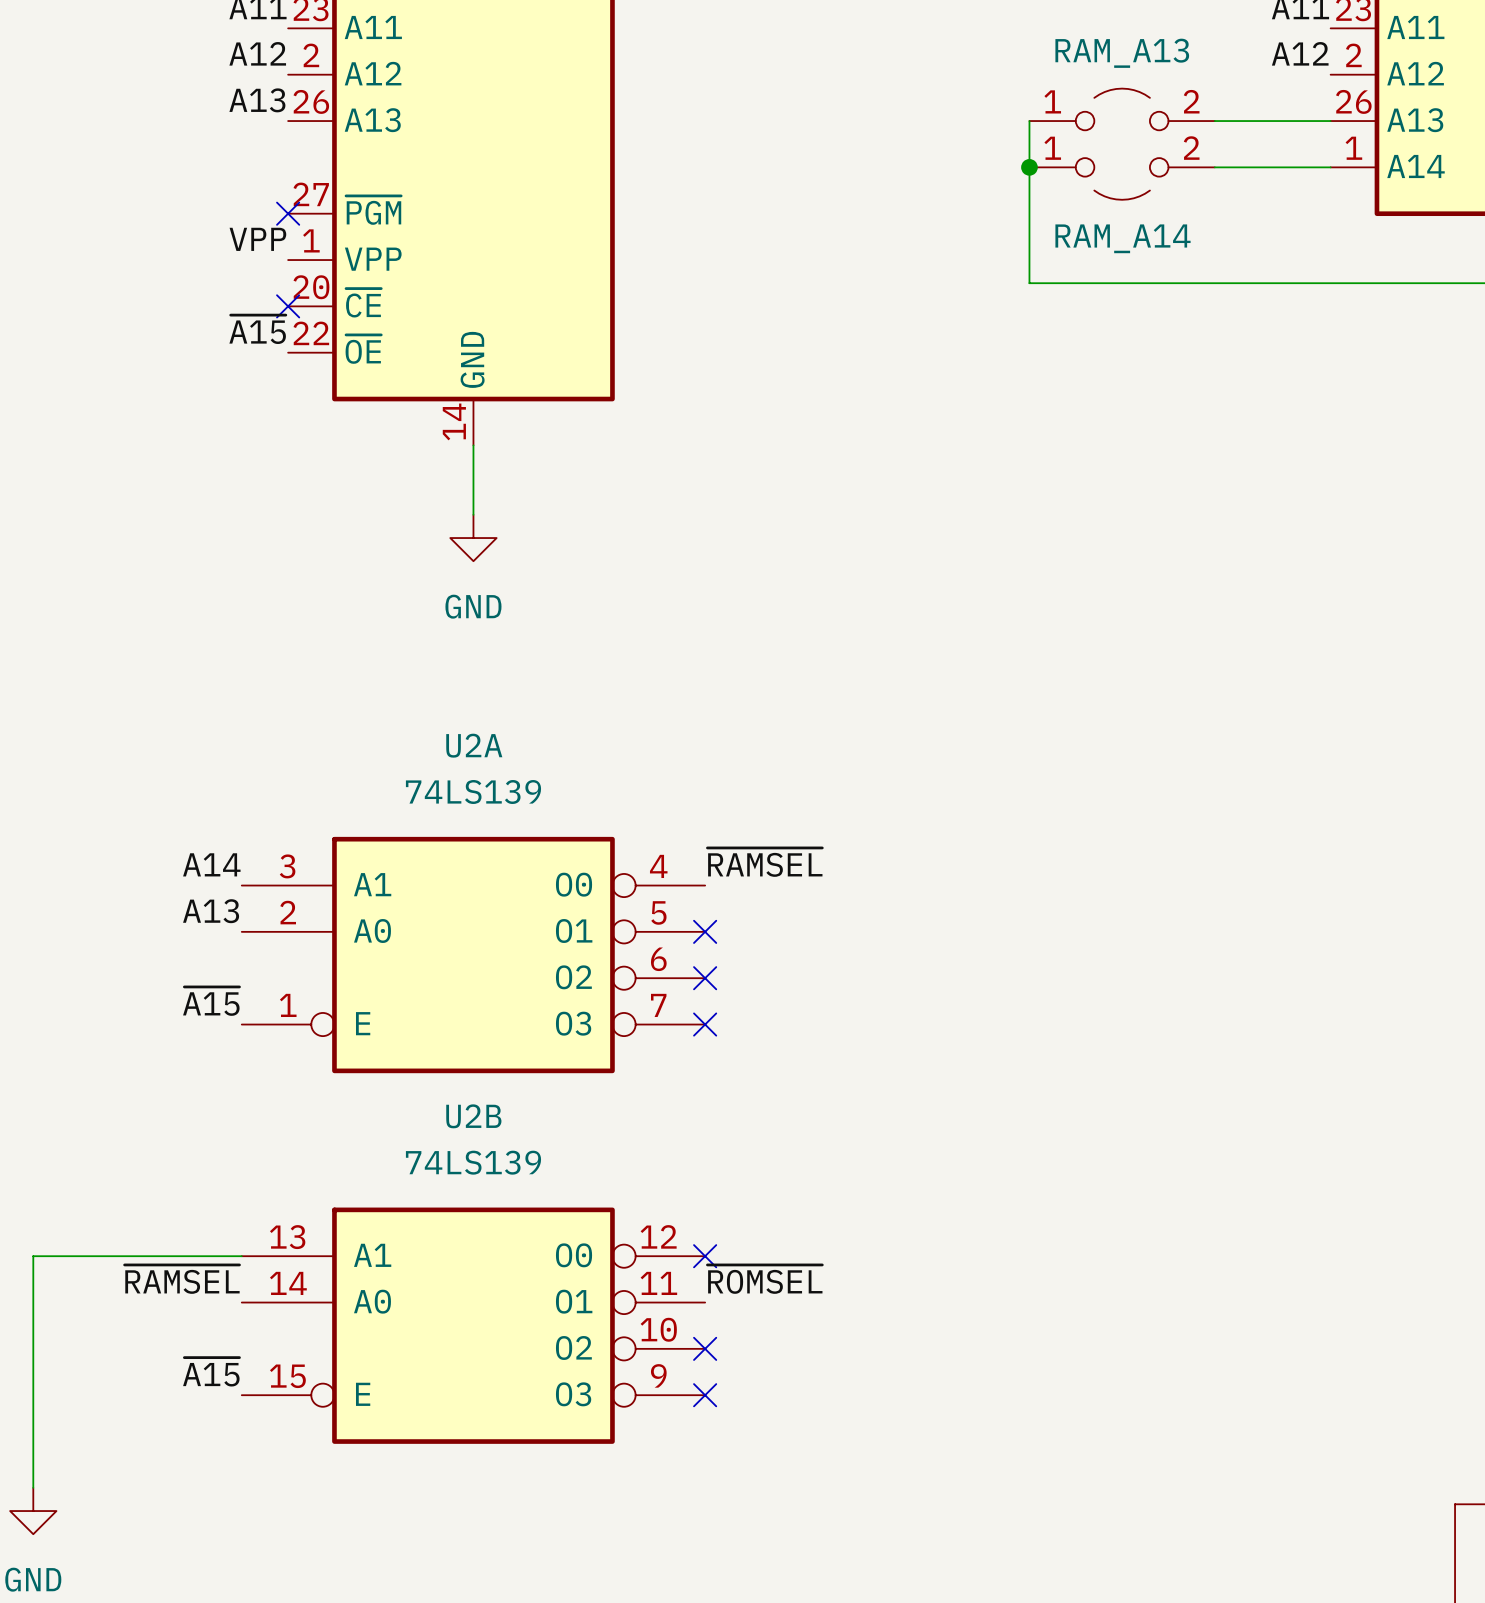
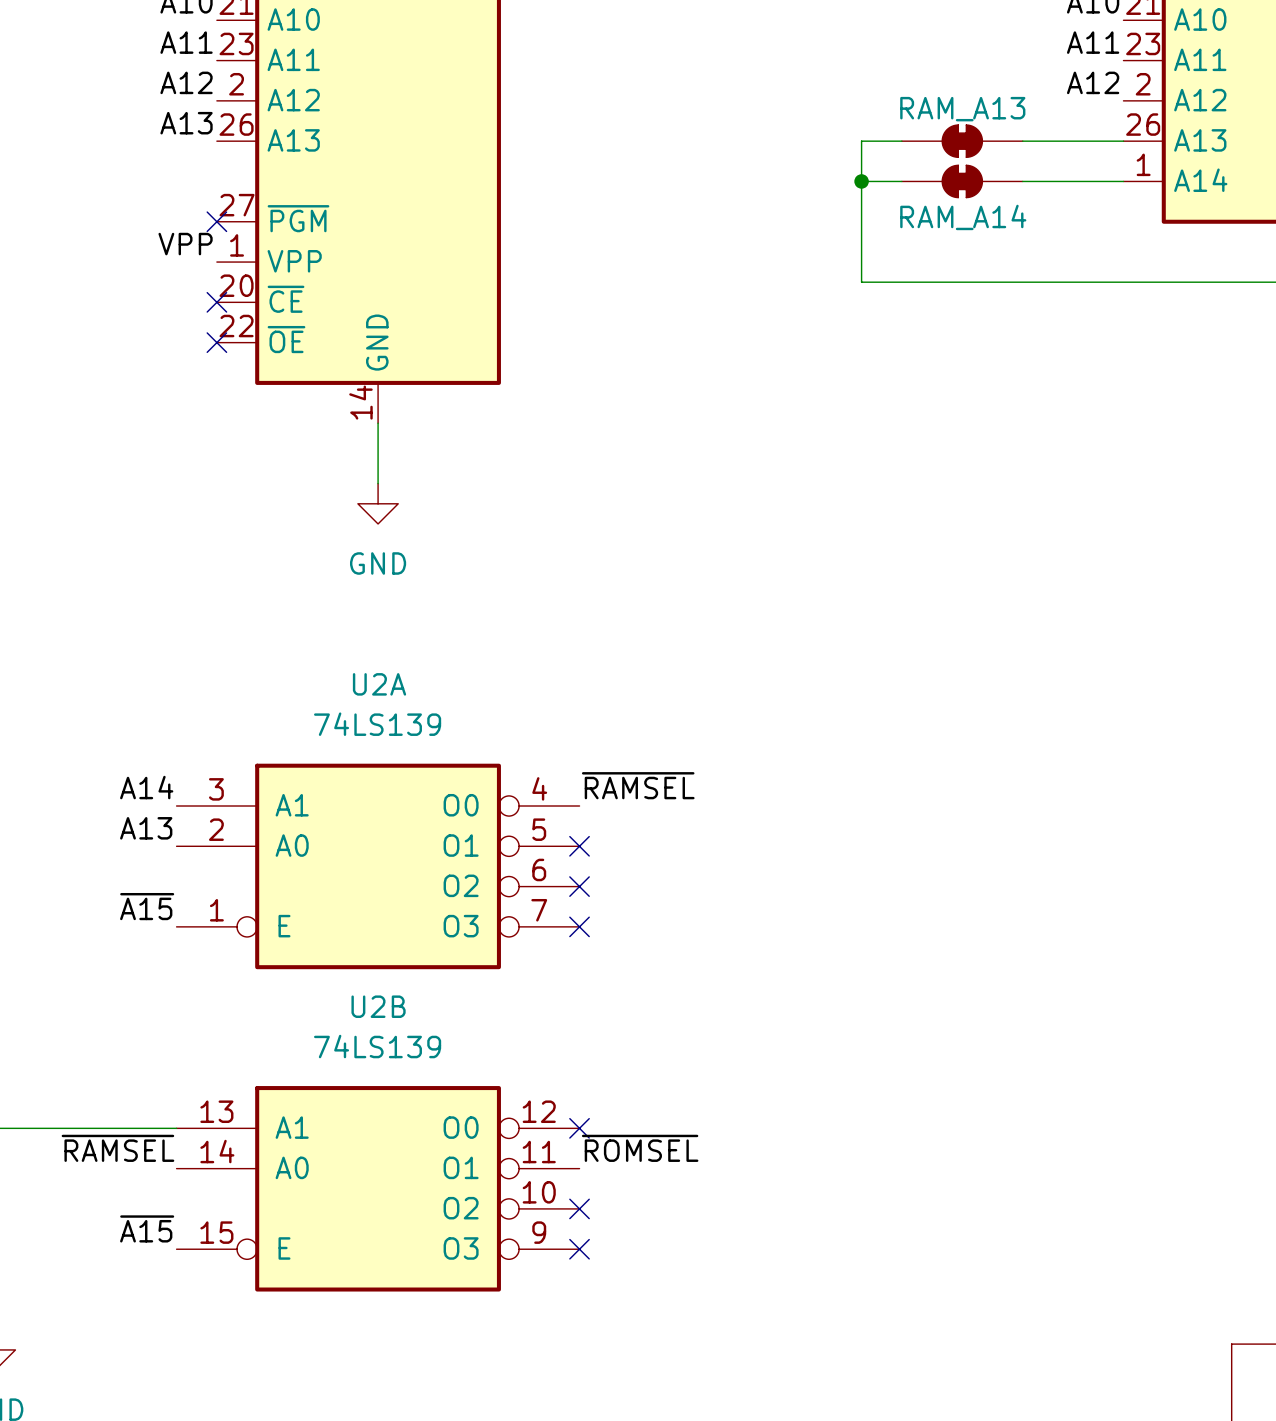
RAM_A13 symbol: [1029, 88, 1215, 131] -> [901, 125, 1023, 158]
RAM_A14 symbol: [1029, 158, 1215, 200] -> [901, 165, 1023, 198]
label: ~{A15} (257, 329) -> none
no-connect mark: none -> (216, 342)

